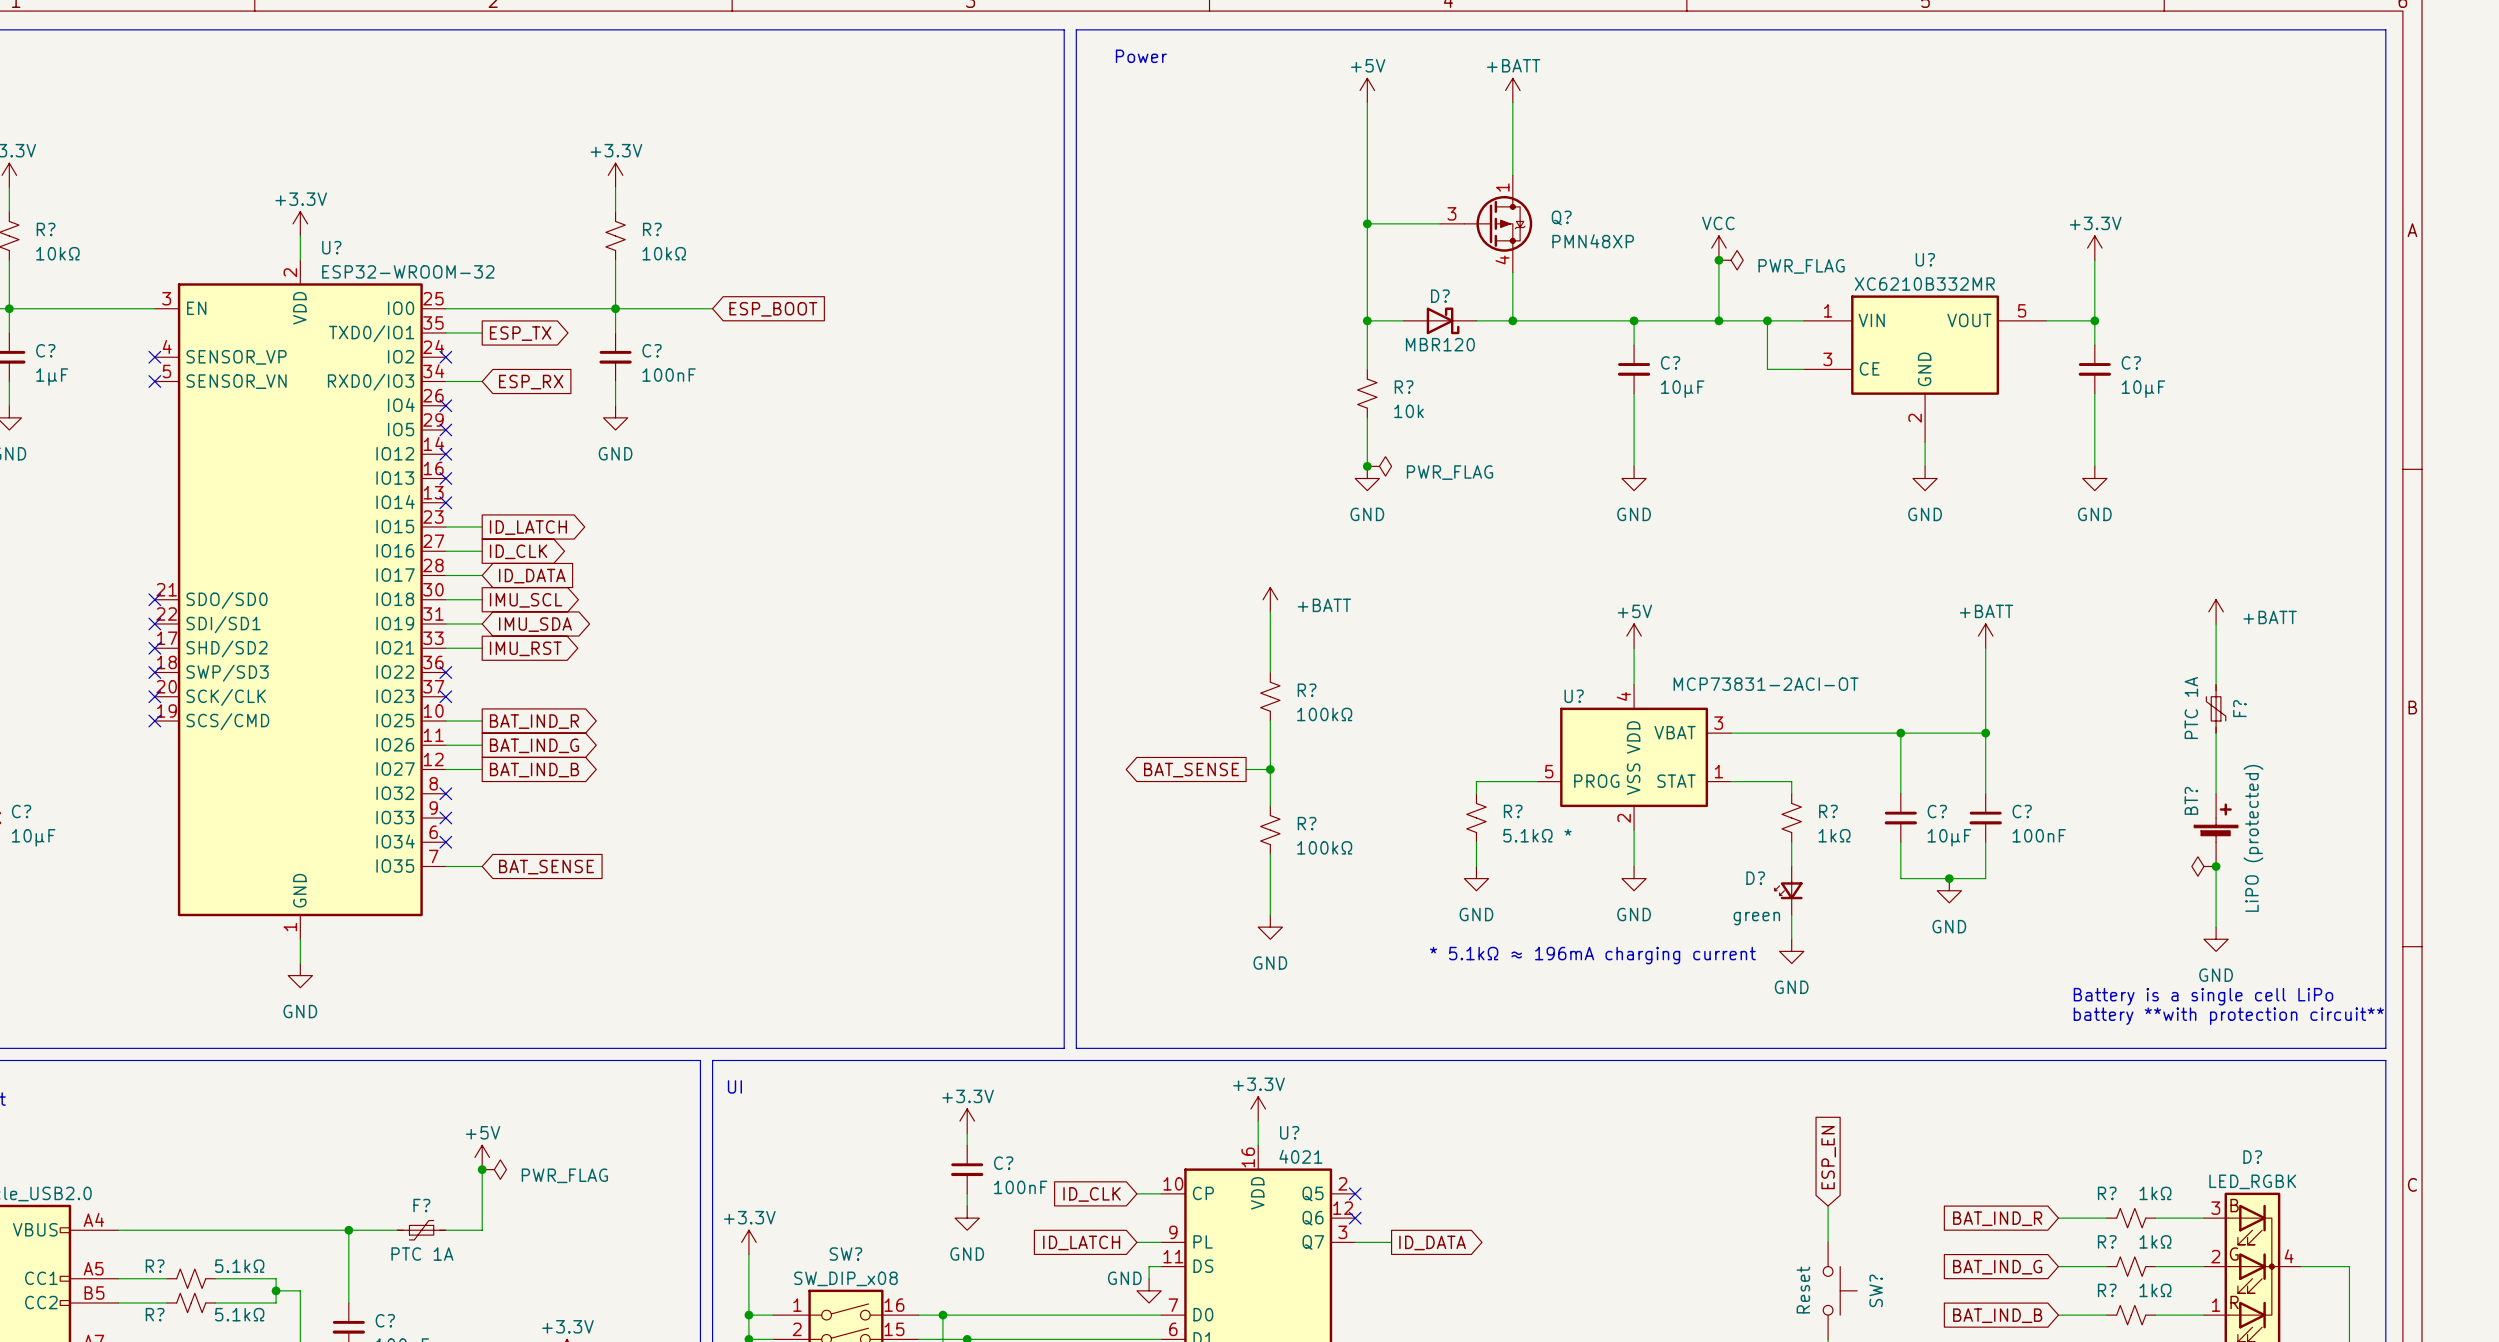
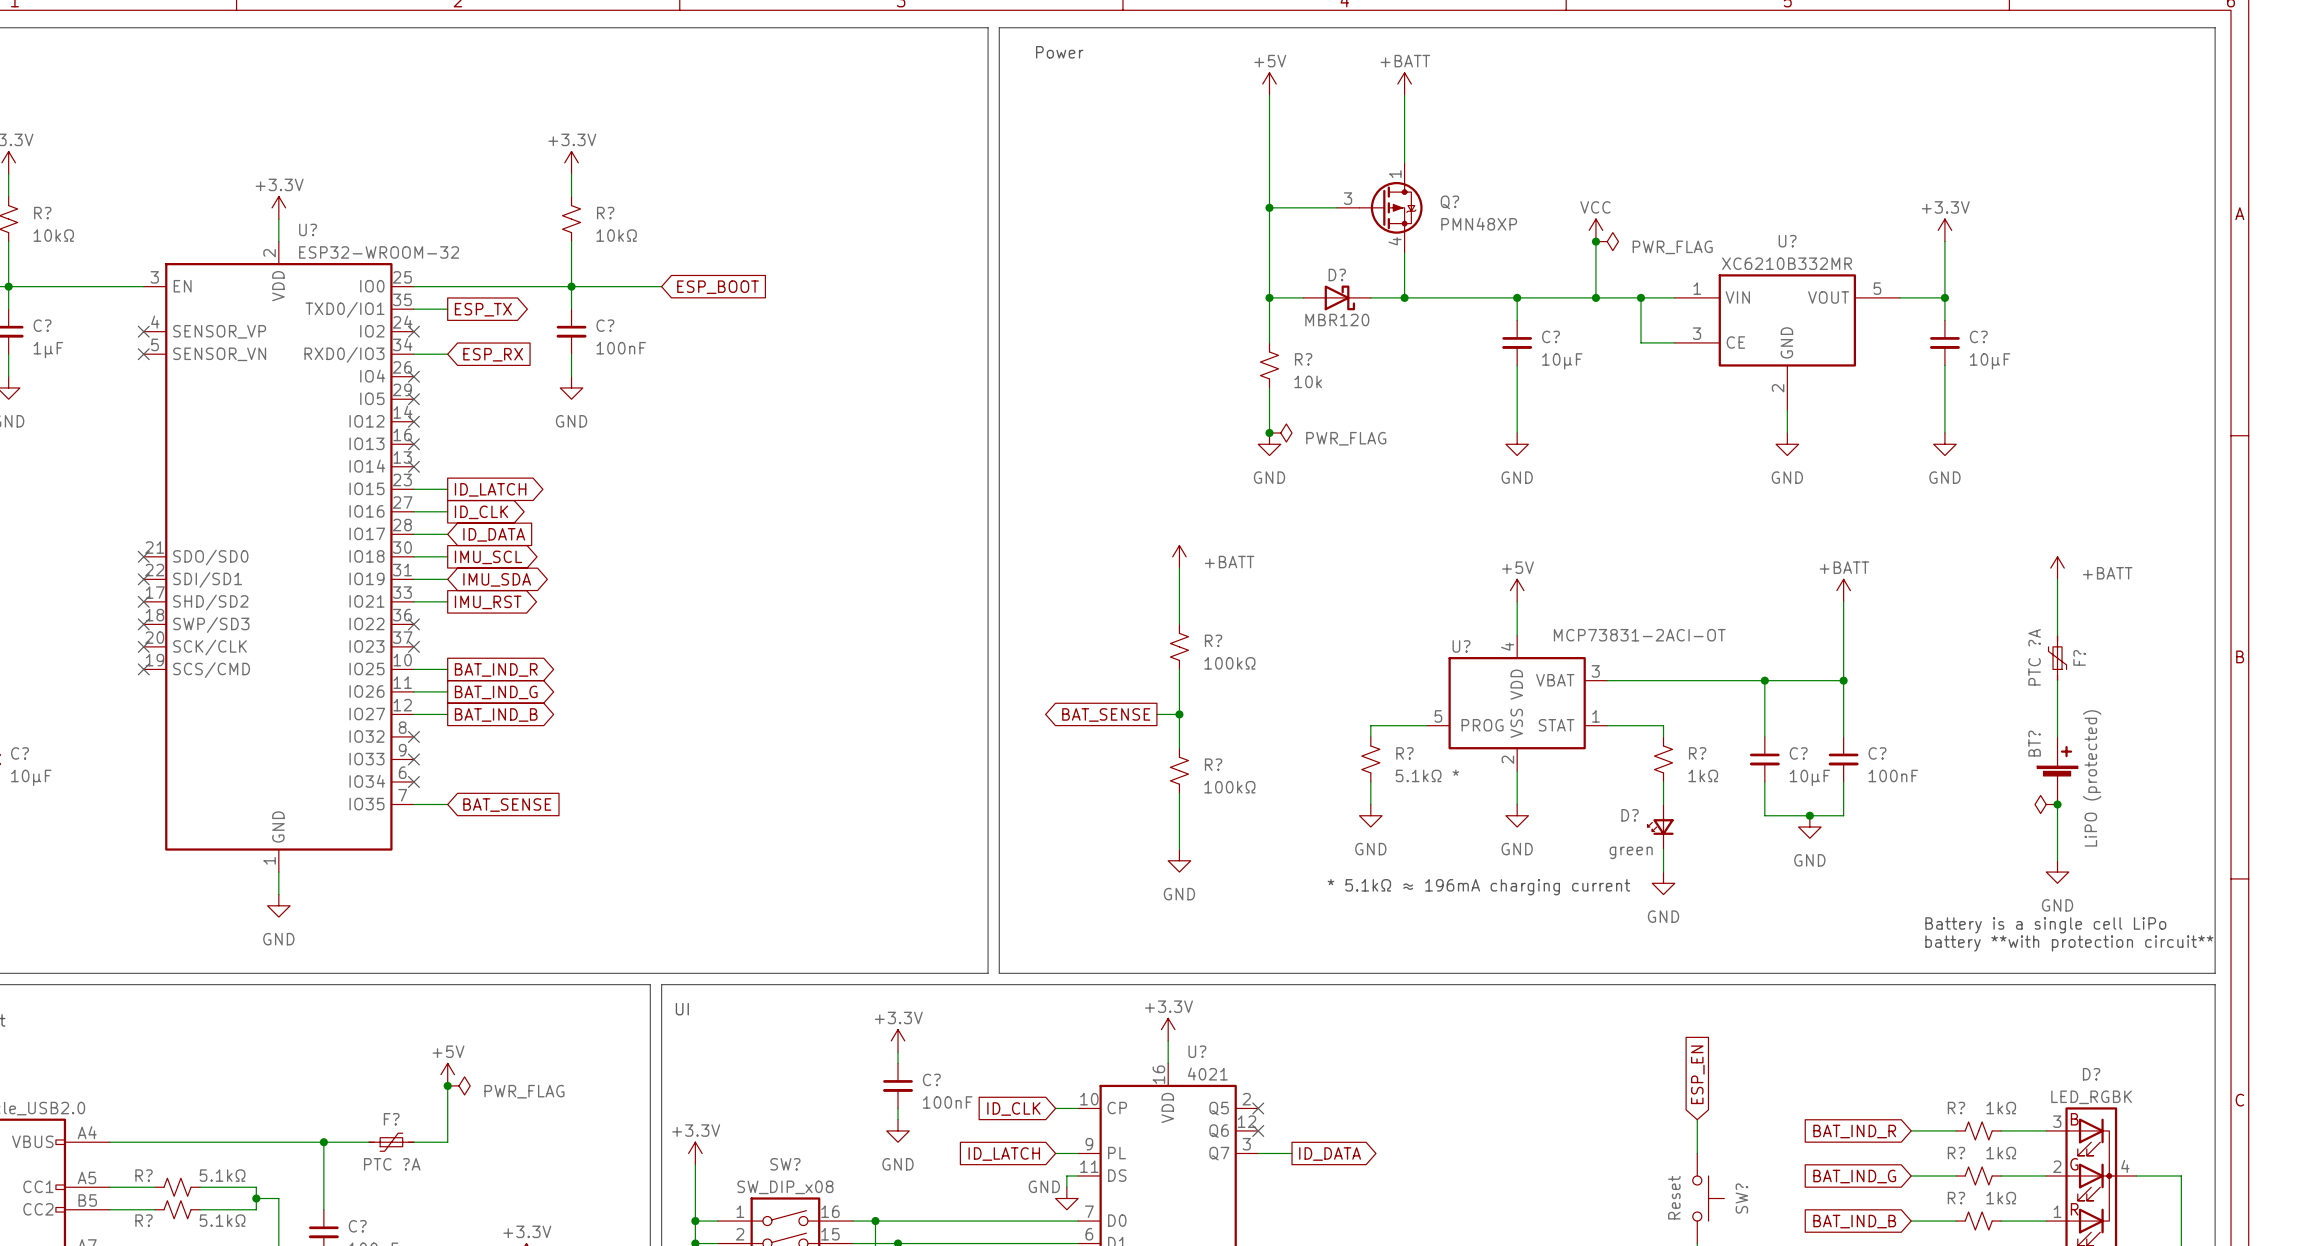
F? value: PTC 1A (2191, 708) -> PTC ?A (2034, 657)
F? value: PTC 1A (422, 1254) -> PTC ?A (392, 1164)

